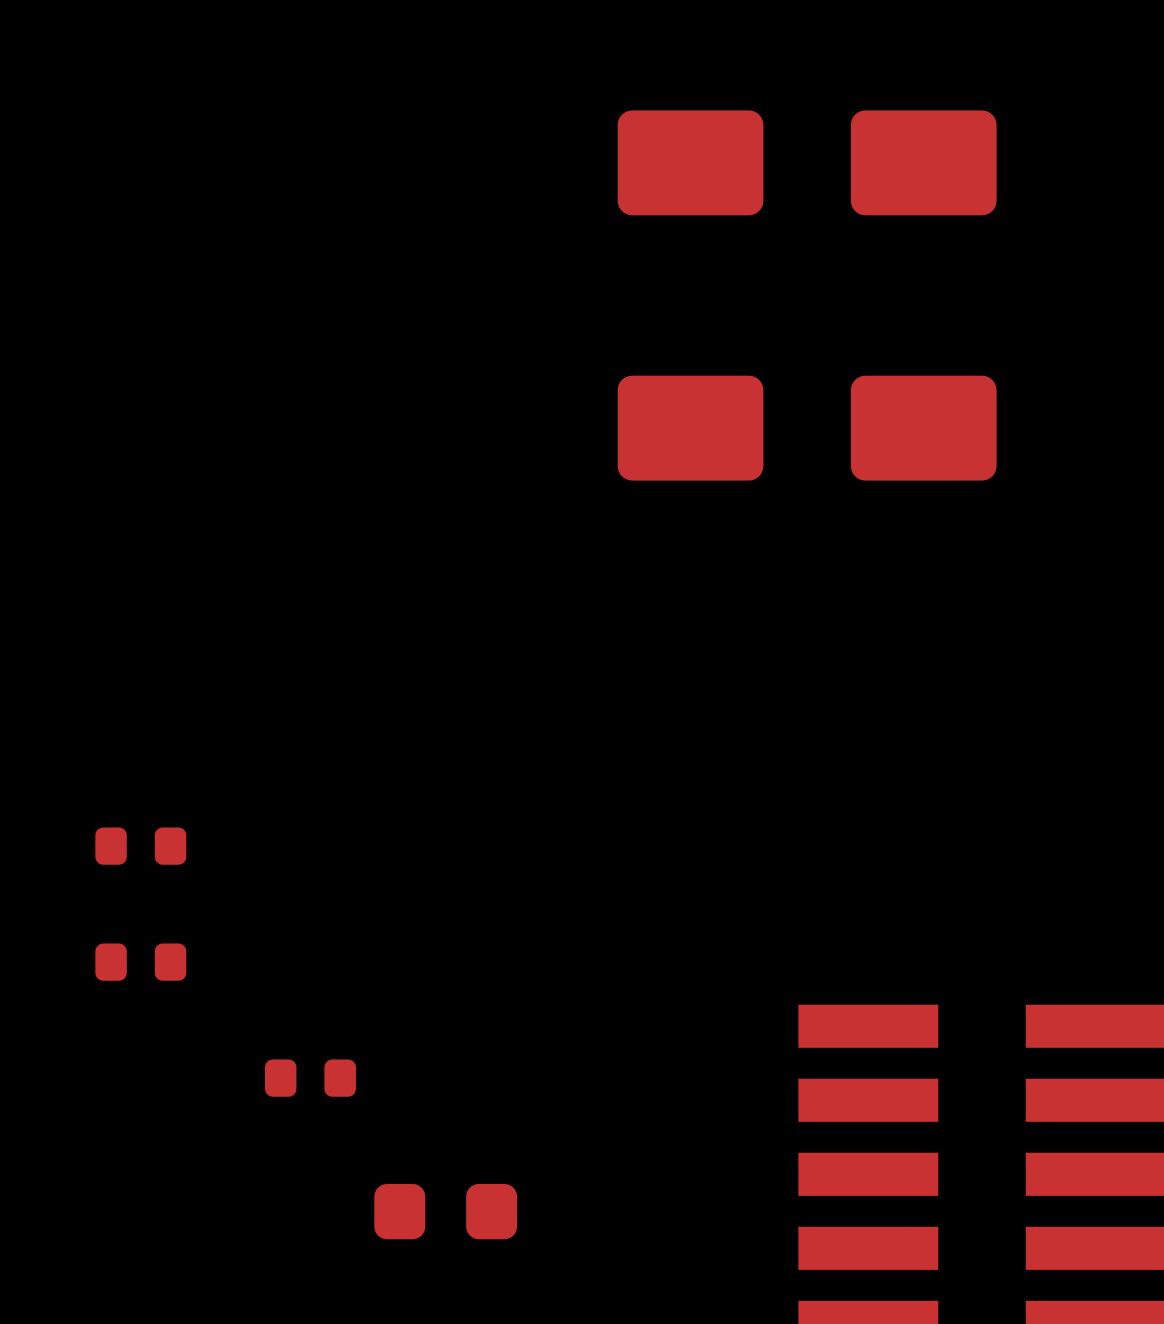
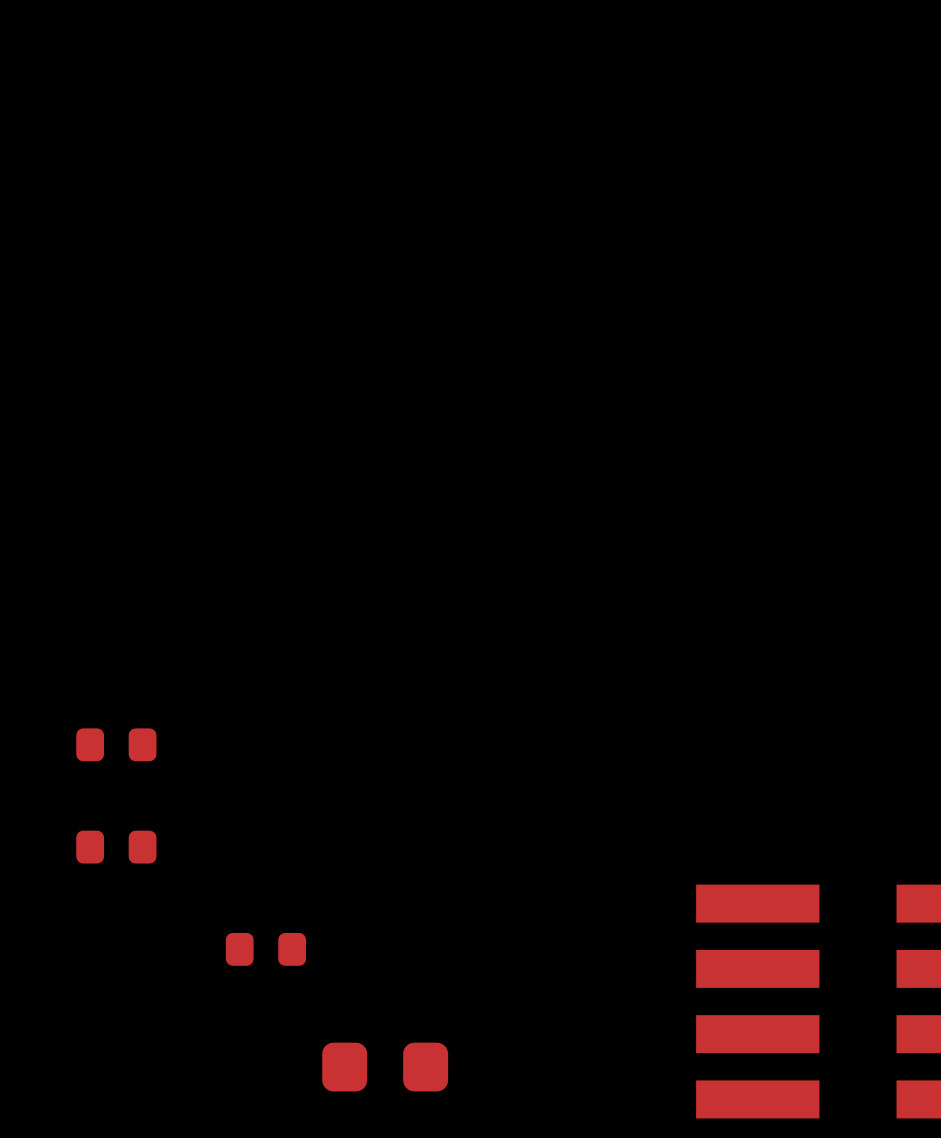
part: (807, 162) -> none
part: (807, 428) -> none

